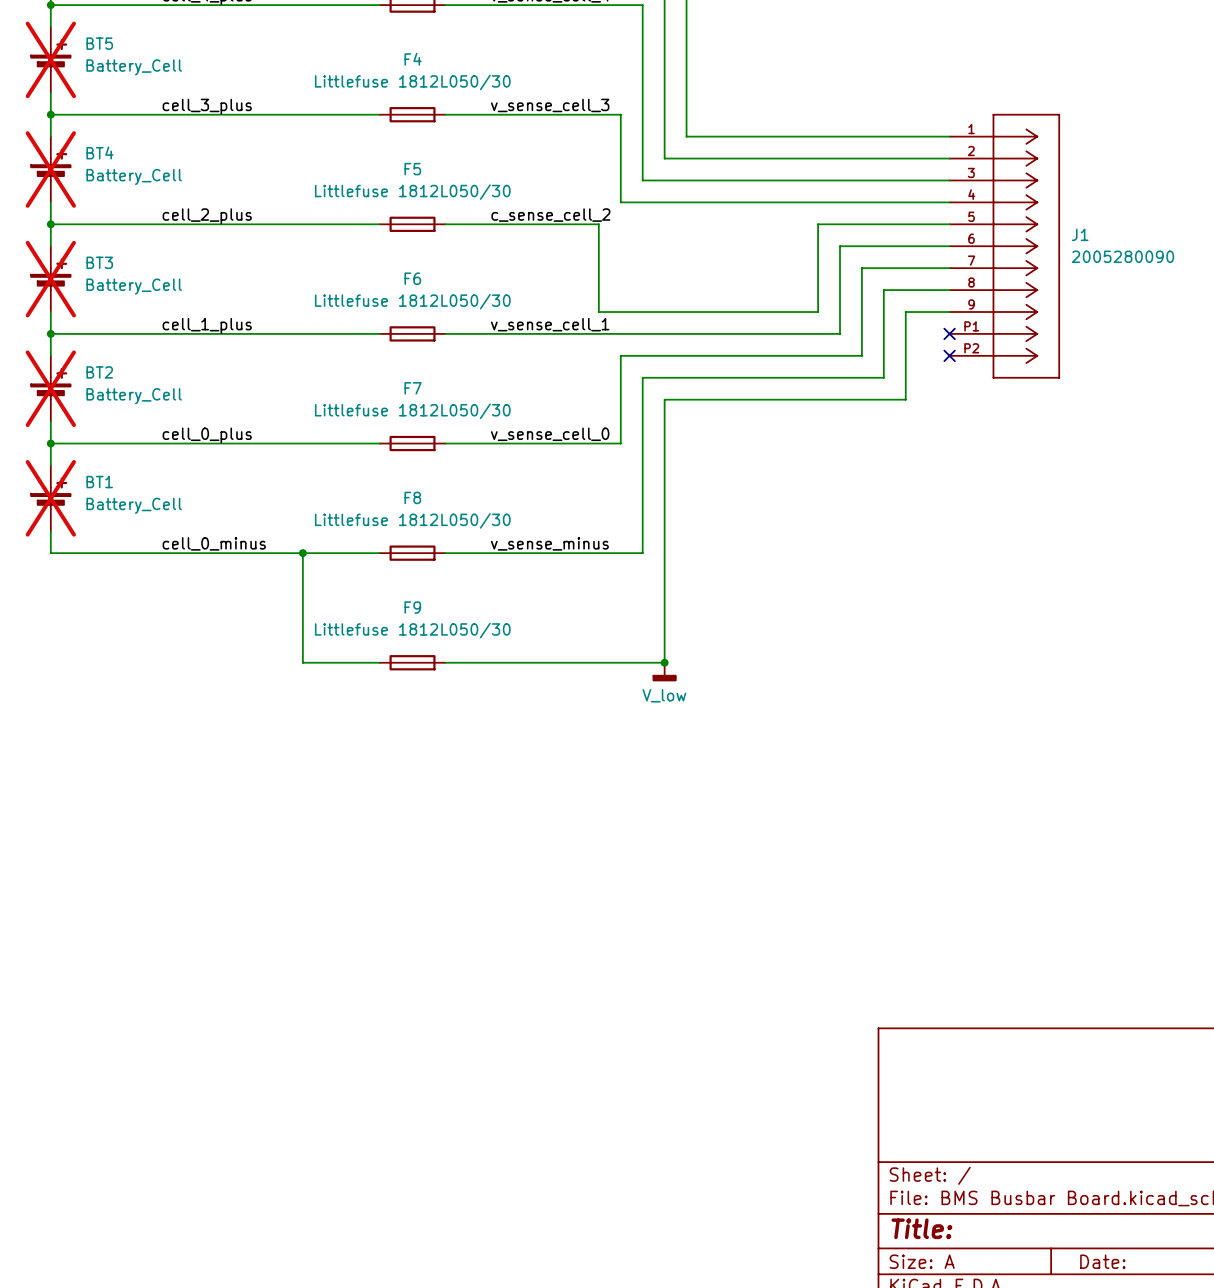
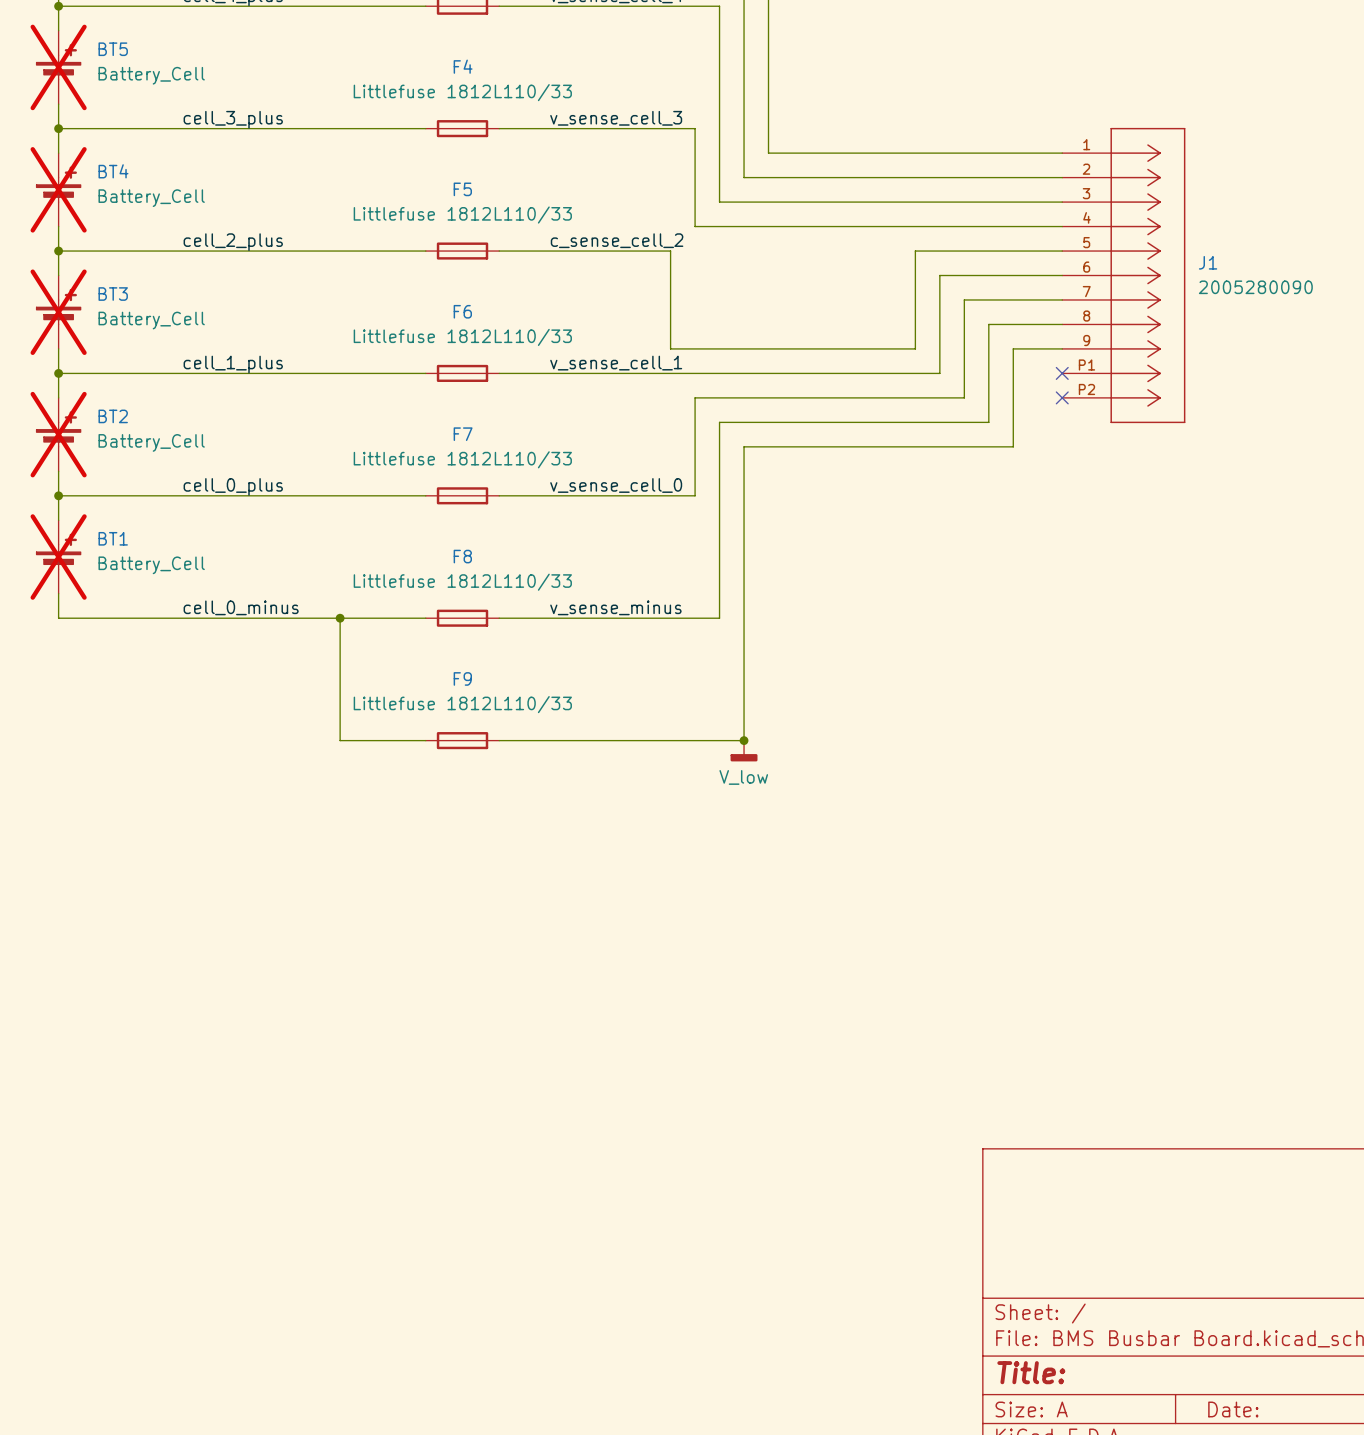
F4 value: Littlefuse 1812L050/30 (412, 82) -> Littlefuse 1812L110/33 (462, 92)
F5 value: Littlefuse 1812L050/30 (412, 192) -> Littlefuse 1812L110/33 (462, 215)
F6 value: Littlefuse 1812L050/30 (412, 301) -> Littlefuse 1812L110/33 (462, 337)
F7 value: Littlefuse 1812L050/30 (412, 411) -> Littlefuse 1812L110/33 (462, 459)
F8 value: Littlefuse 1812L050/30 (412, 520) -> Littlefuse 1812L110/33 (462, 582)
F9 value: Littlefuse 1812L050/30 (412, 630) -> Littlefuse 1812L110/33 (462, 704)

